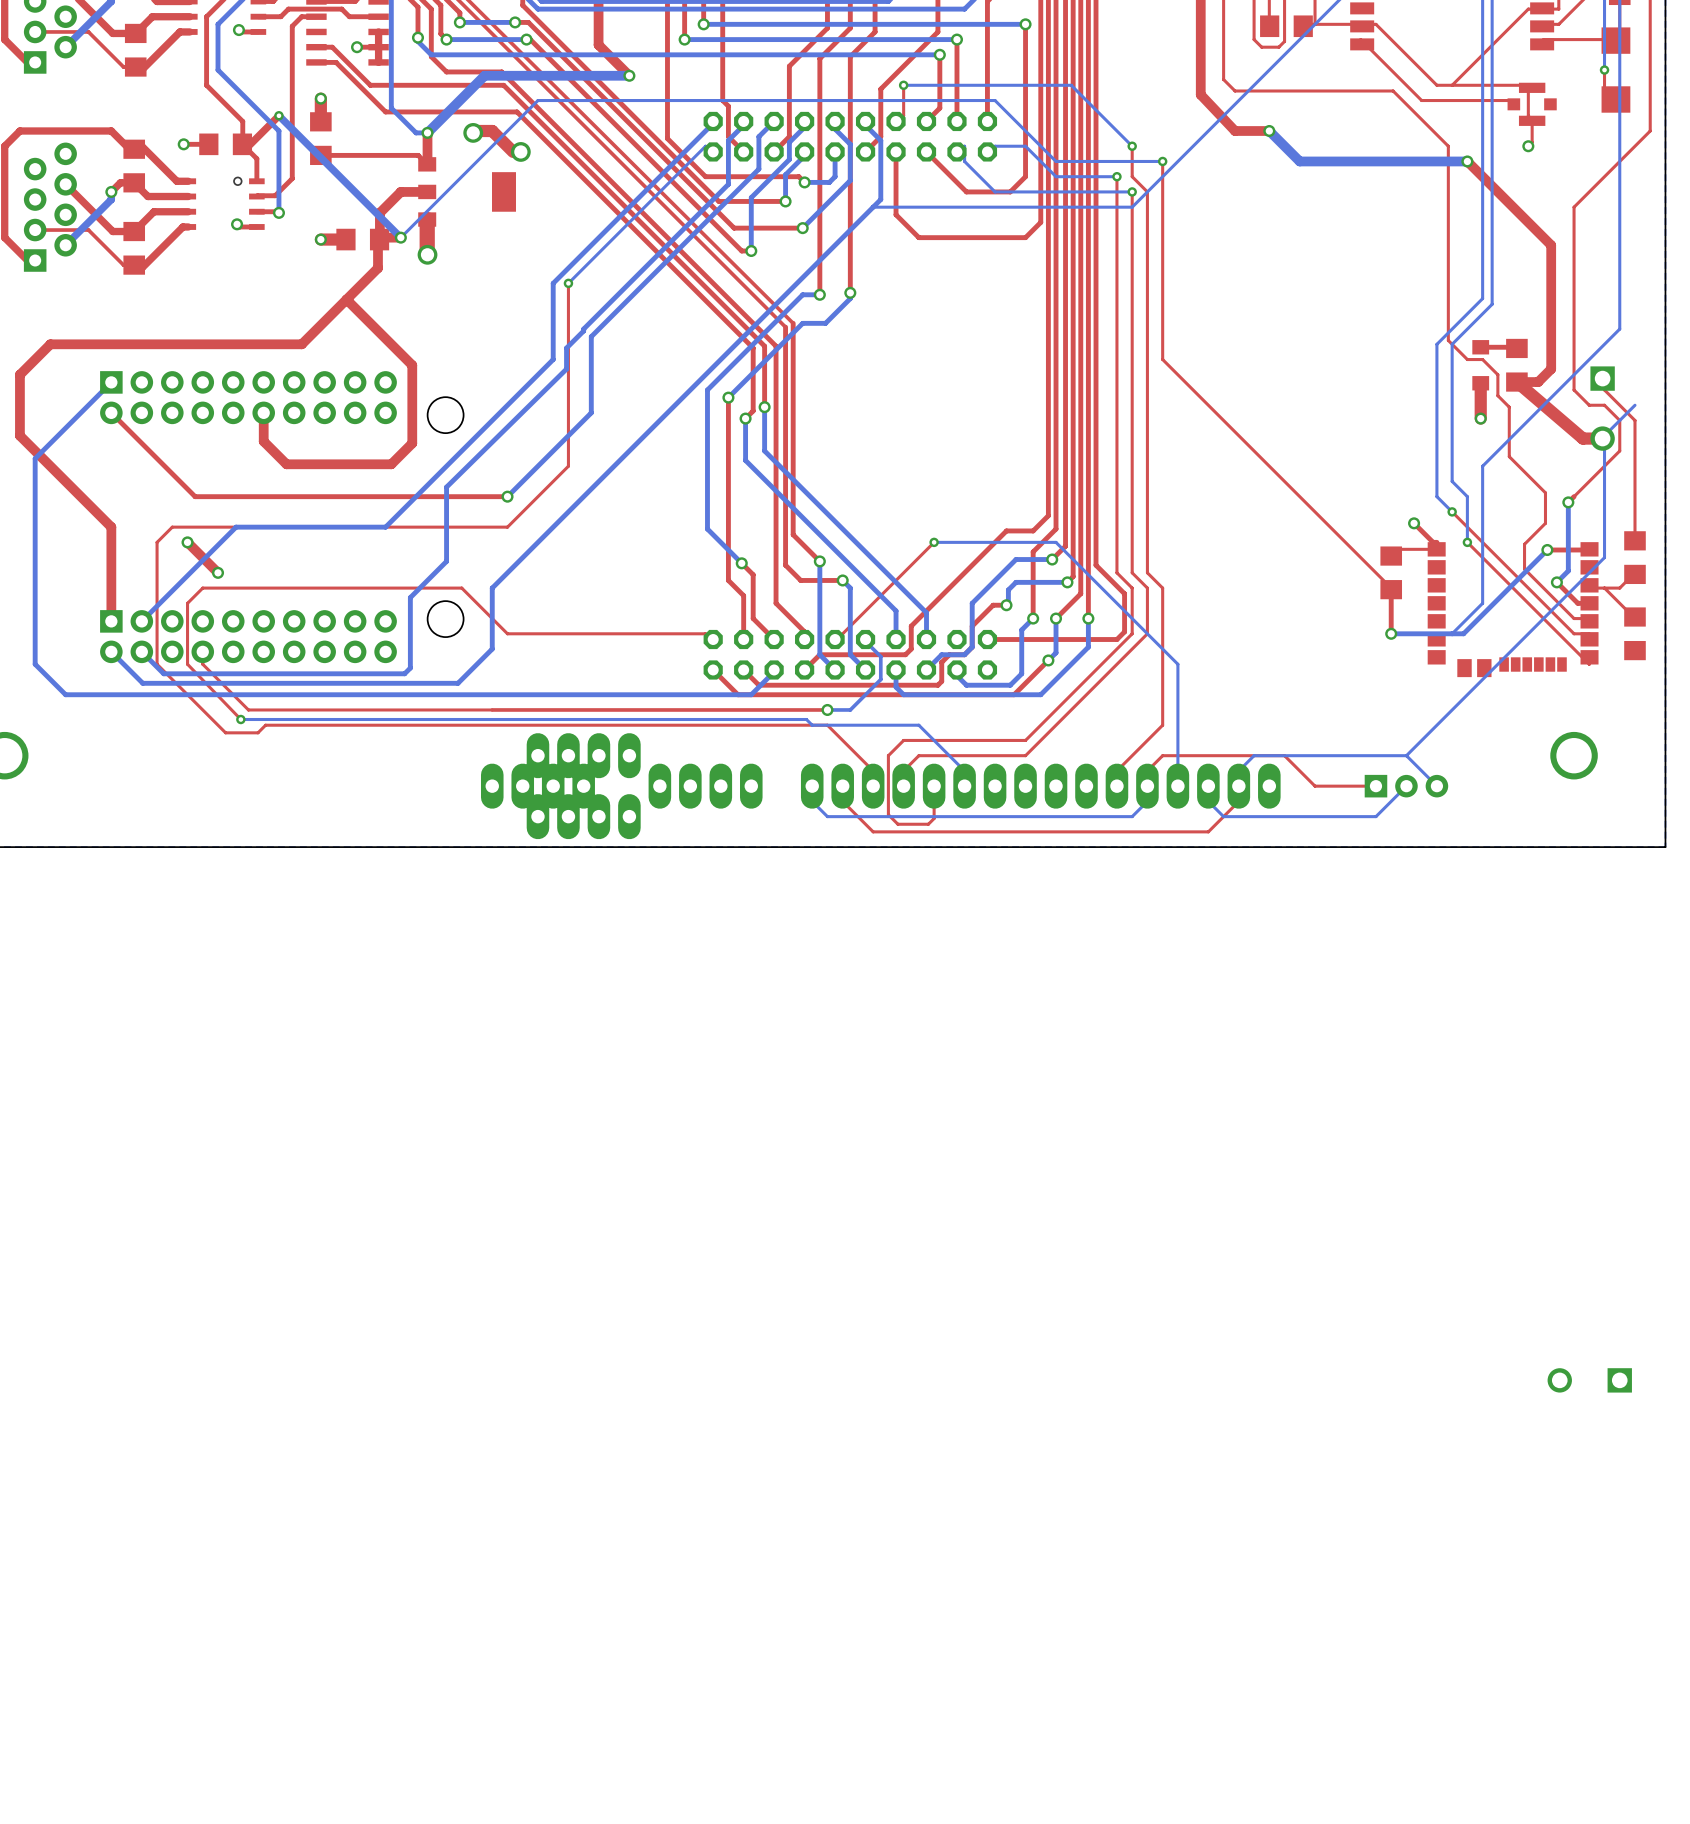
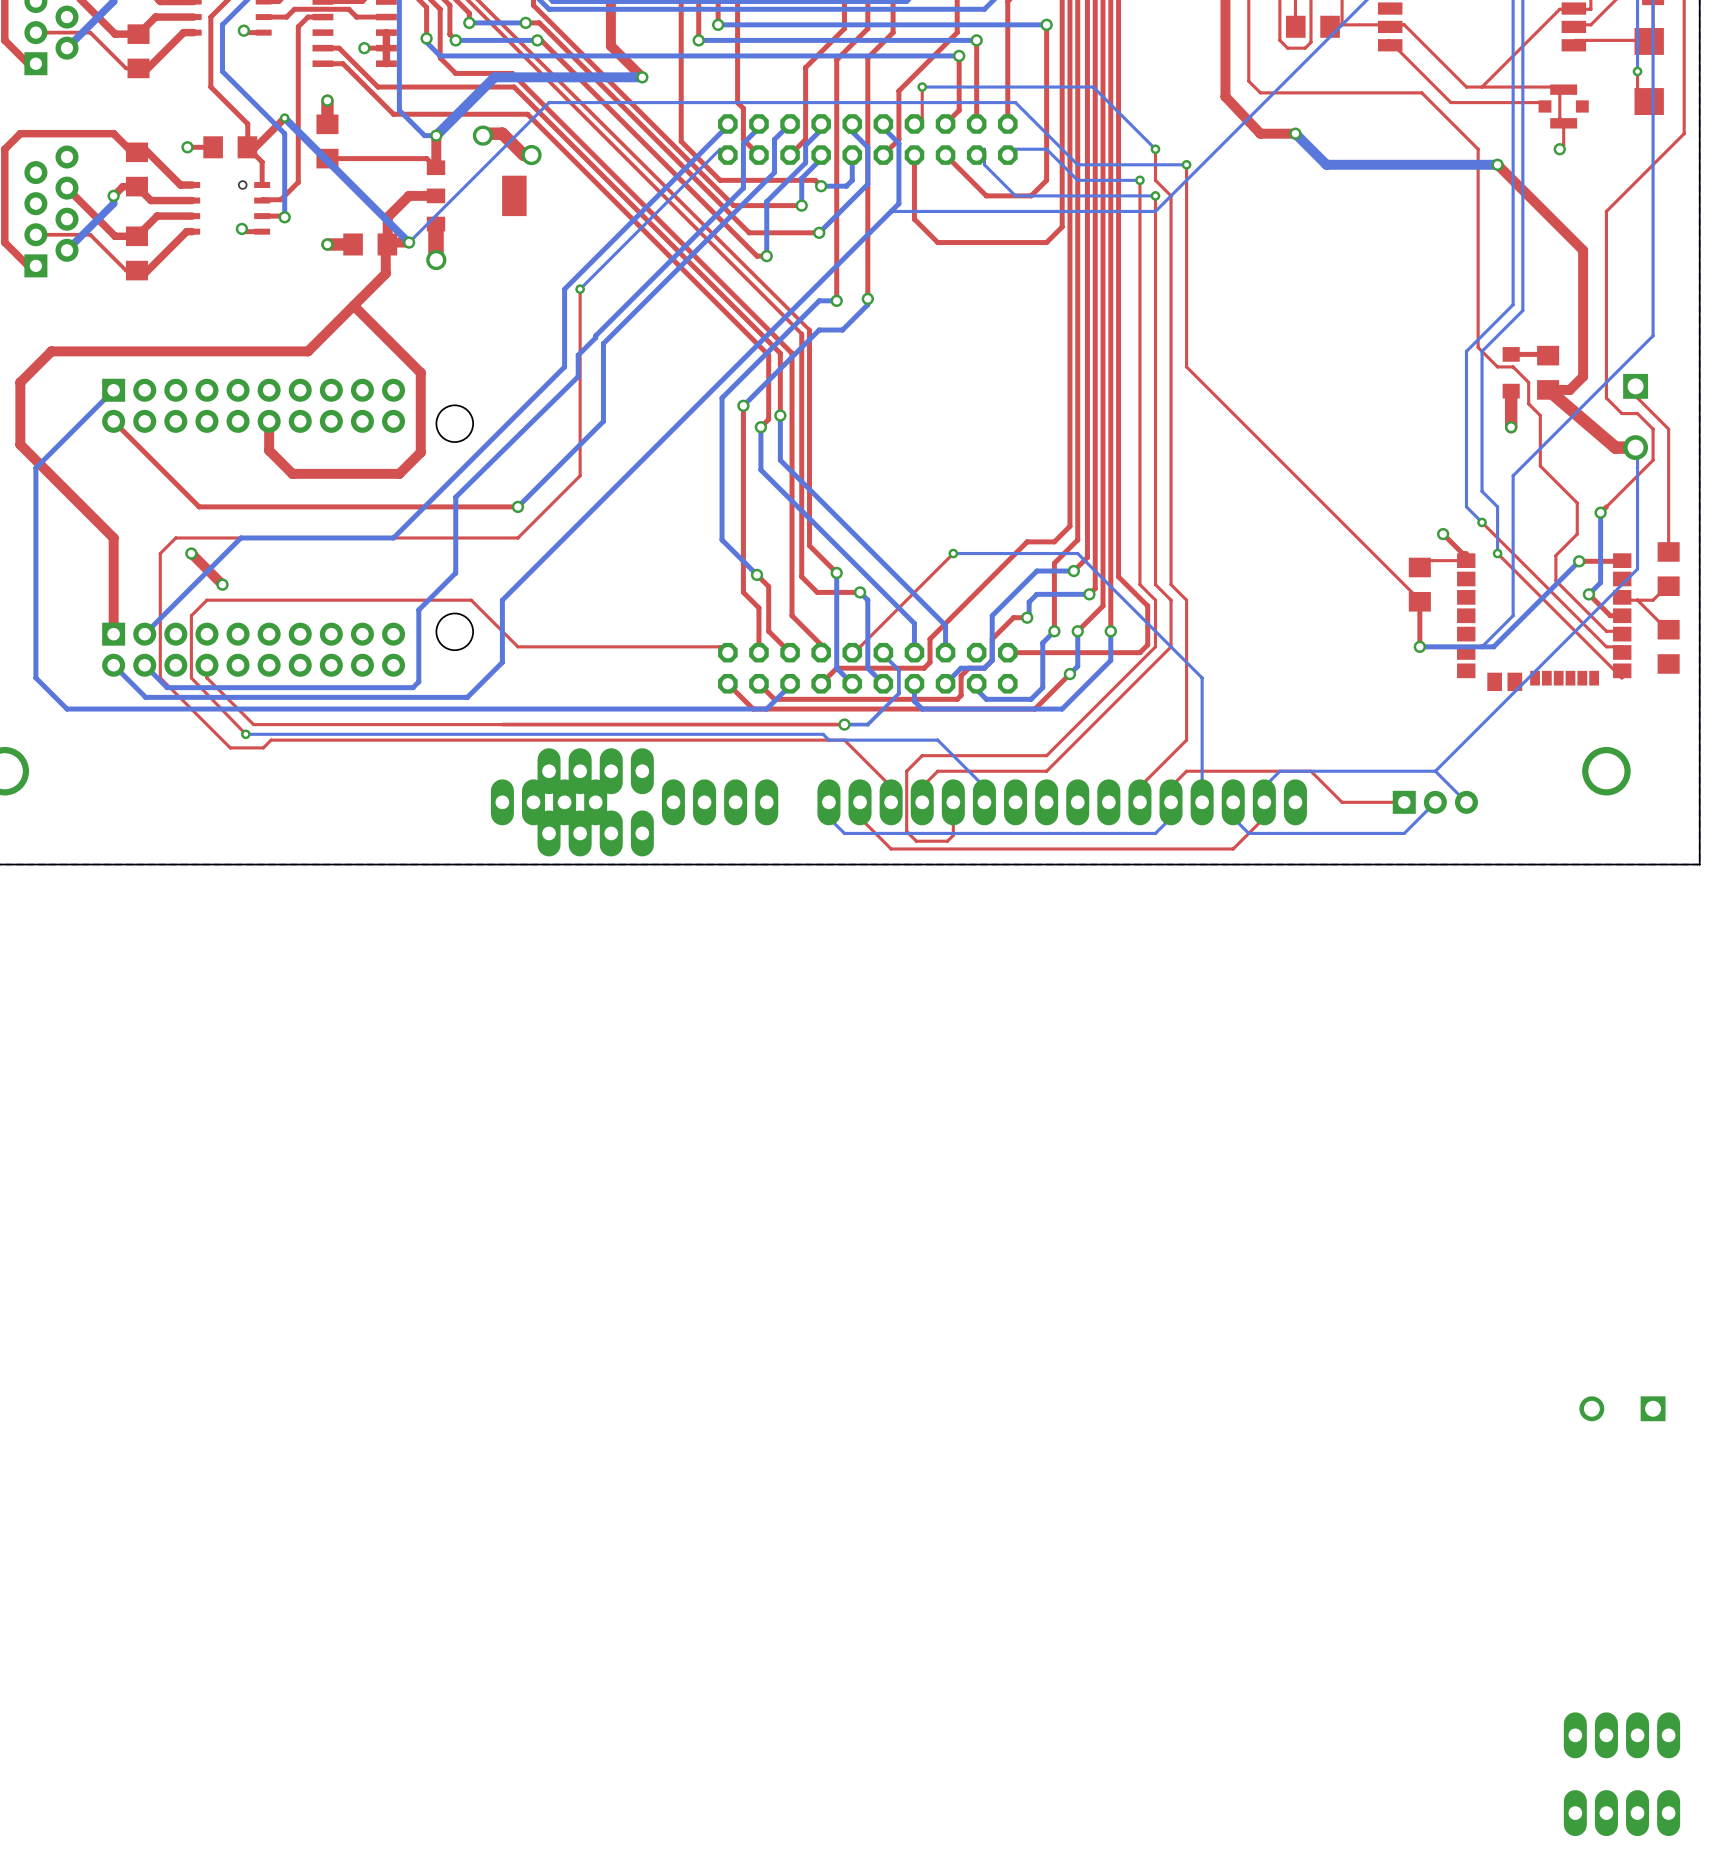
bottom track: (1634, 405) (1604, 435) -> none
part: none -> (1621, 1735)
part: none -> (1621, 1813)

